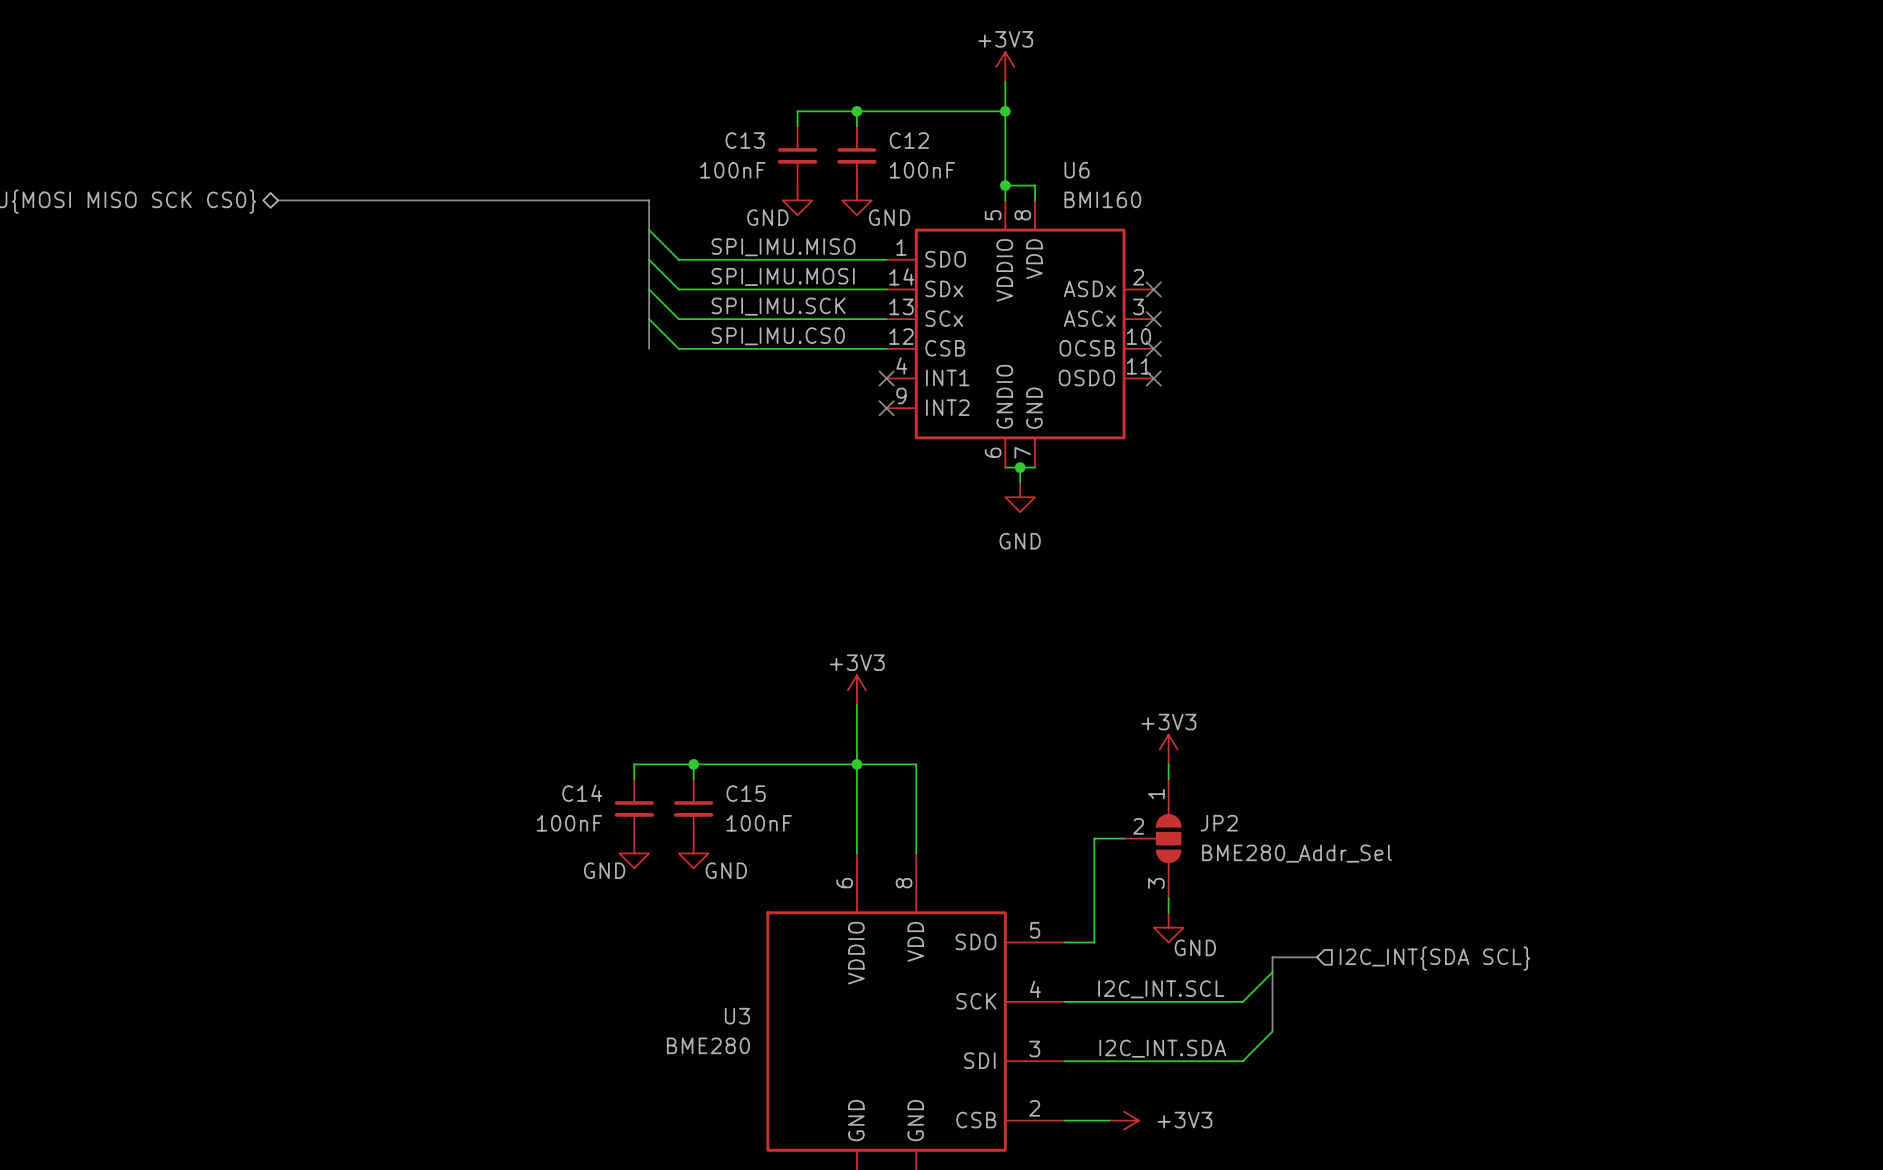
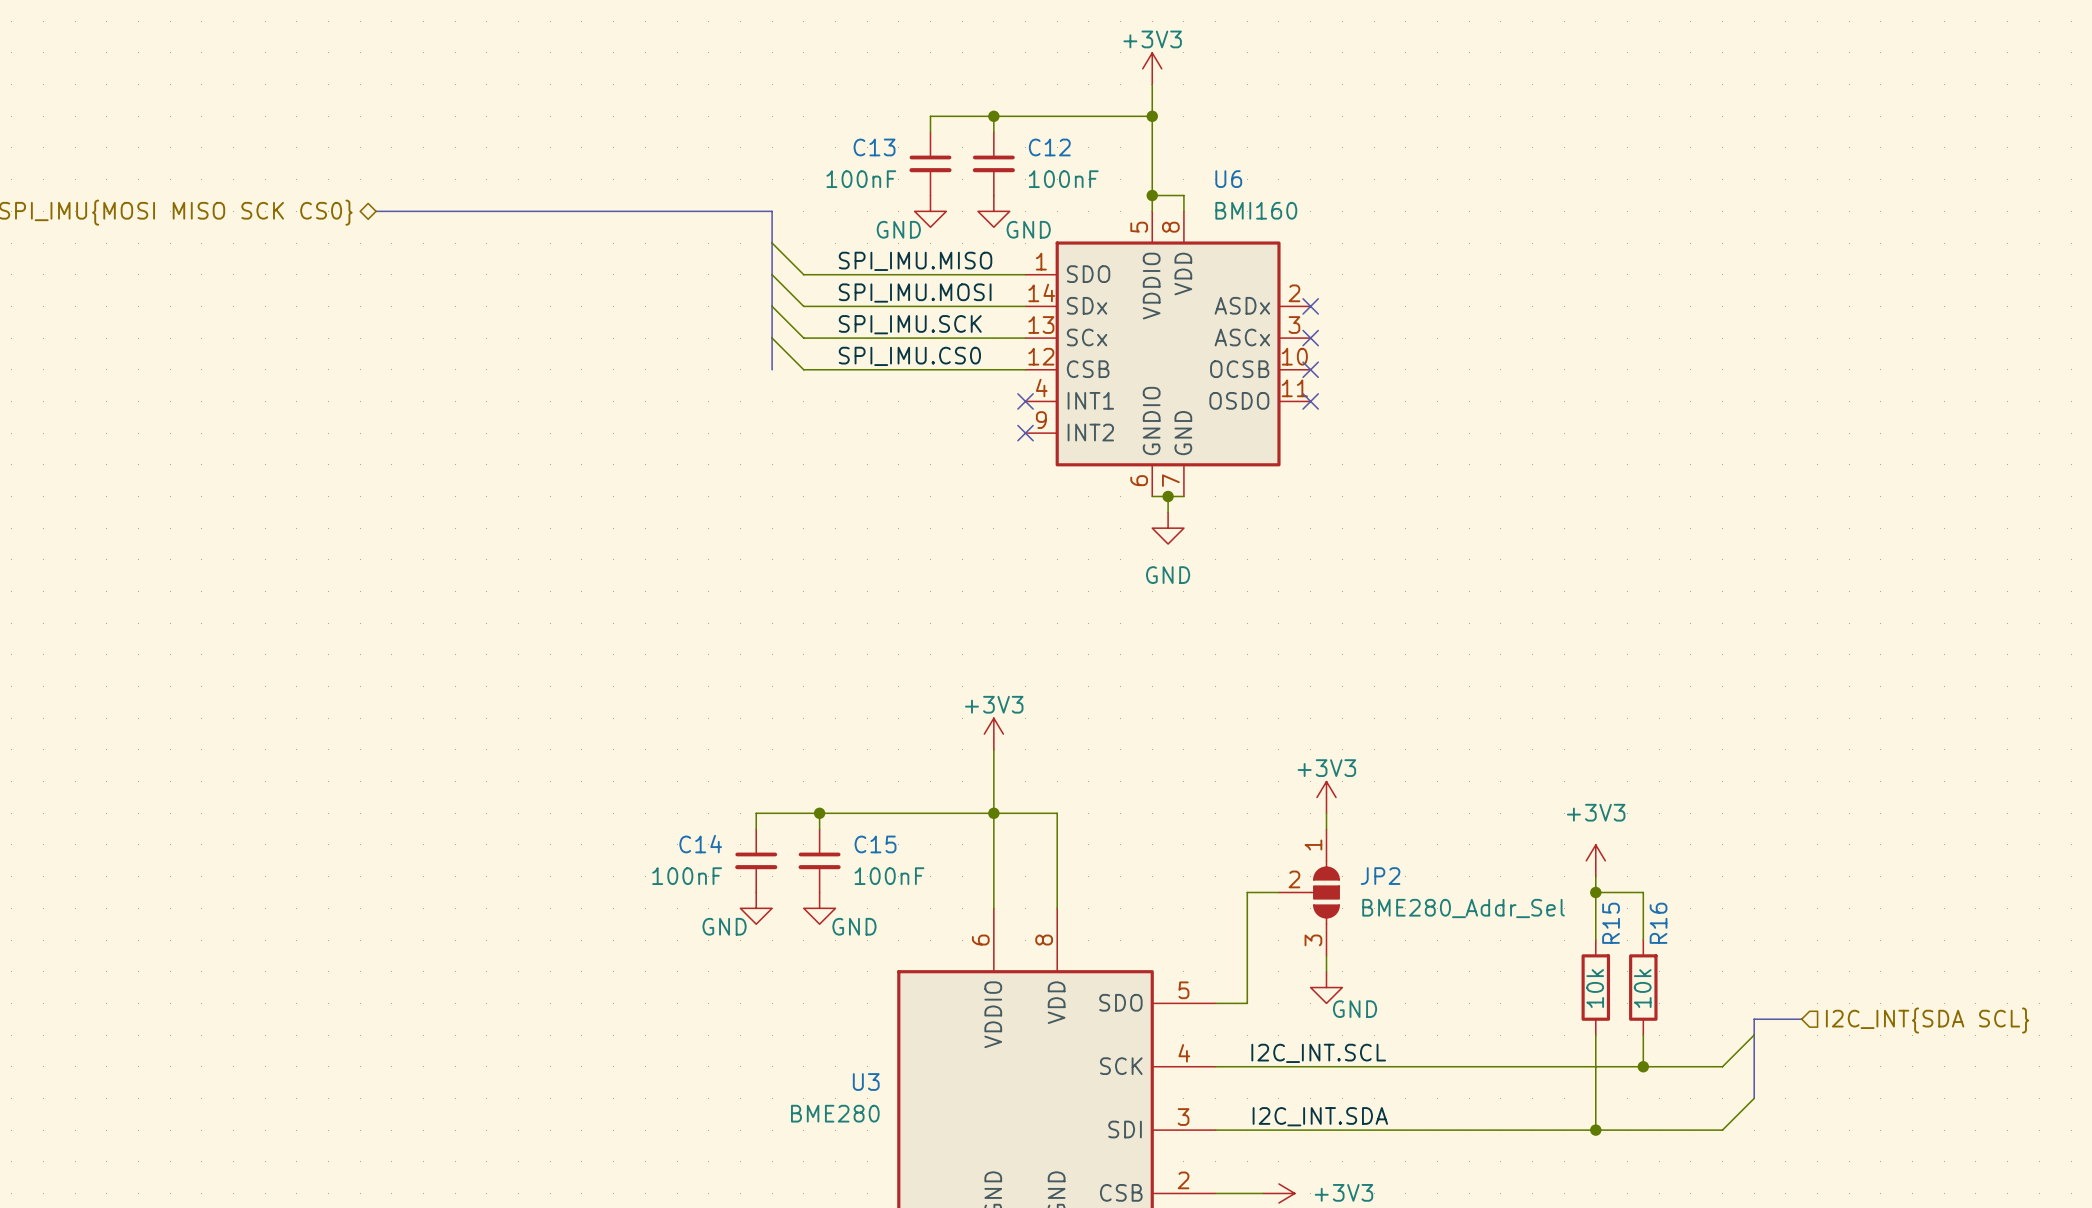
power symbol: none -> +3V3 (1595, 860)
wire: none -> (1595, 876) (1595, 940)
wire: none -> (1595, 892) (1643, 892) (1643, 940)
junction: none -> (1595, 892)
R15: none -> 10k (1595, 987)
R16: none -> 10k (1643, 987)
bus: (1317, 957) (1272, 957) (1272, 1031) -> none
bus: none -> (1801, 1019) (1754, 1019) (1754, 1098)
hierarchical label: I2C_INT{SDA SCL} (1434, 958) -> none
hierarchical label: none -> I2C_INT{SDA SCL} (1927, 1020)
wire: (1272, 972) (1242, 1001) -> (1754, 1035) (1722, 1066) (1405, 1066)
wire: none -> (1595, 1035) (1595, 1130)
wire: none -> (1643, 1035) (1643, 1066)
junction: none -> (1643, 1066)
wire: (1272, 1031) (1242, 1061) -> (1754, 1098) (1722, 1130) (1405, 1130)
junction: none -> (1595, 1130)

